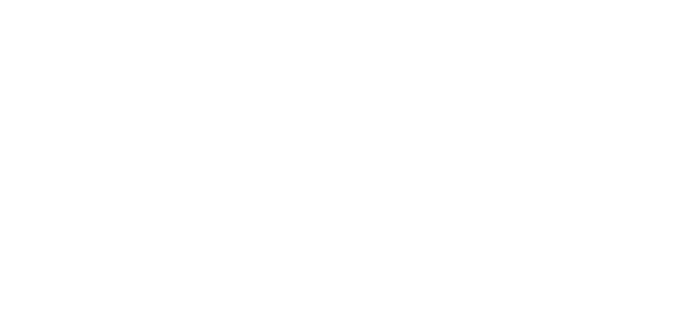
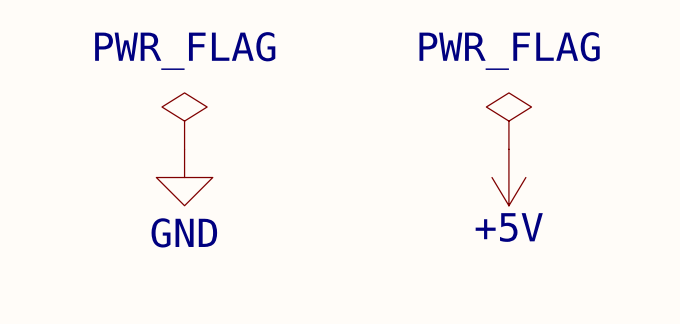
power symbol: none -> PWR_FLAG (184, 121)
power symbol: none -> PWR_FLAG (508, 121)
power symbol: none -> GND (184, 177)
power symbol: none -> +5V (508, 177)

